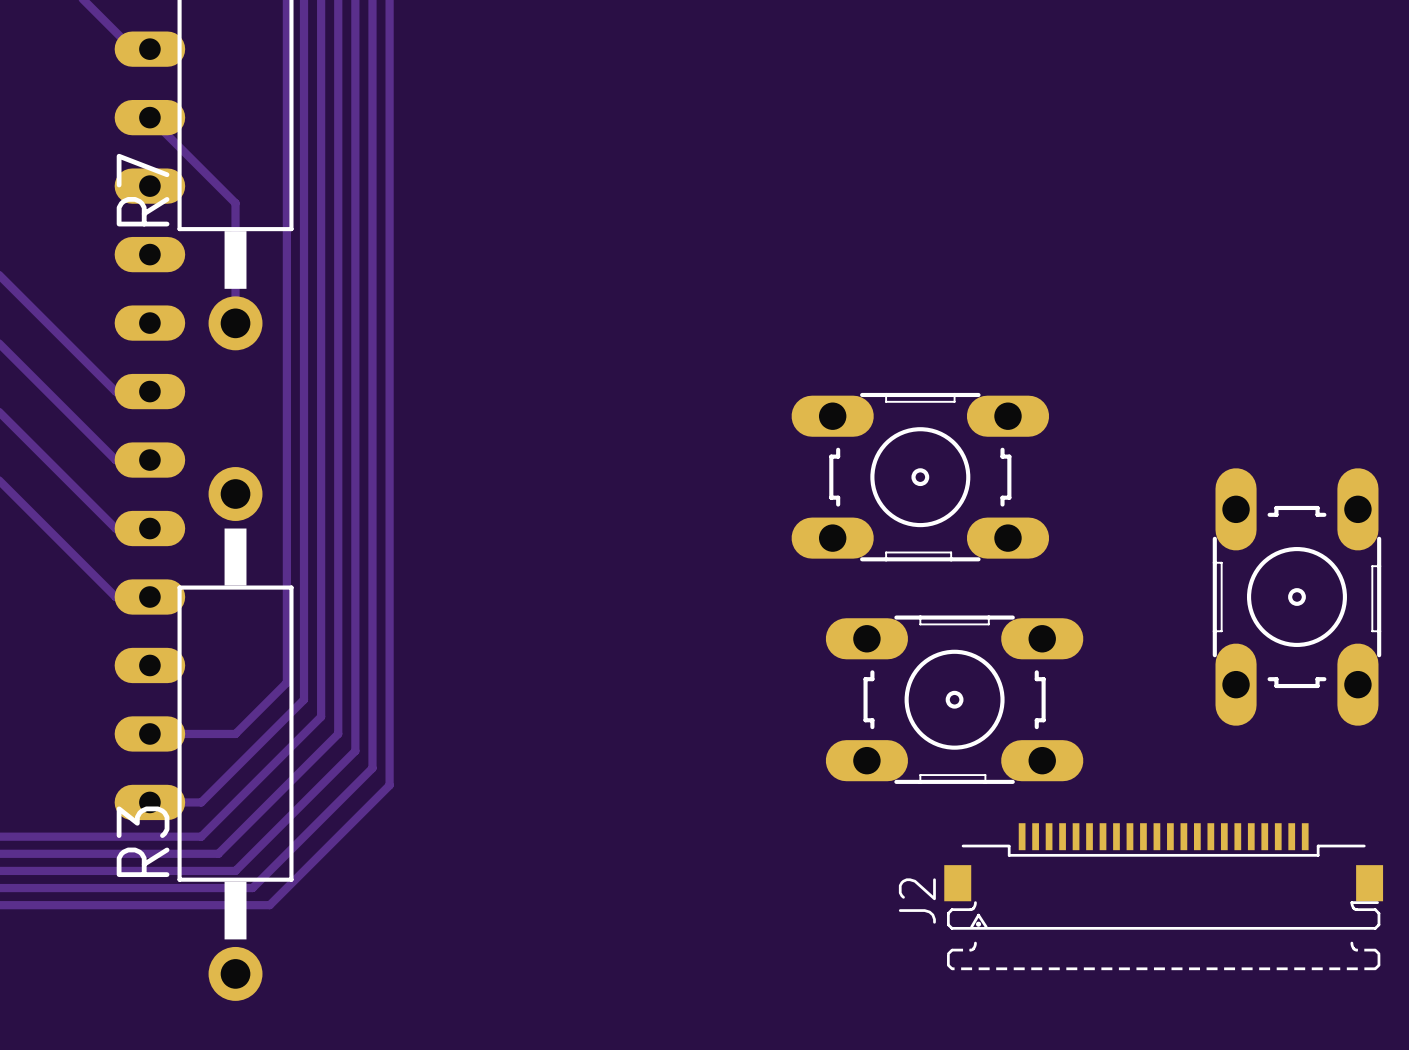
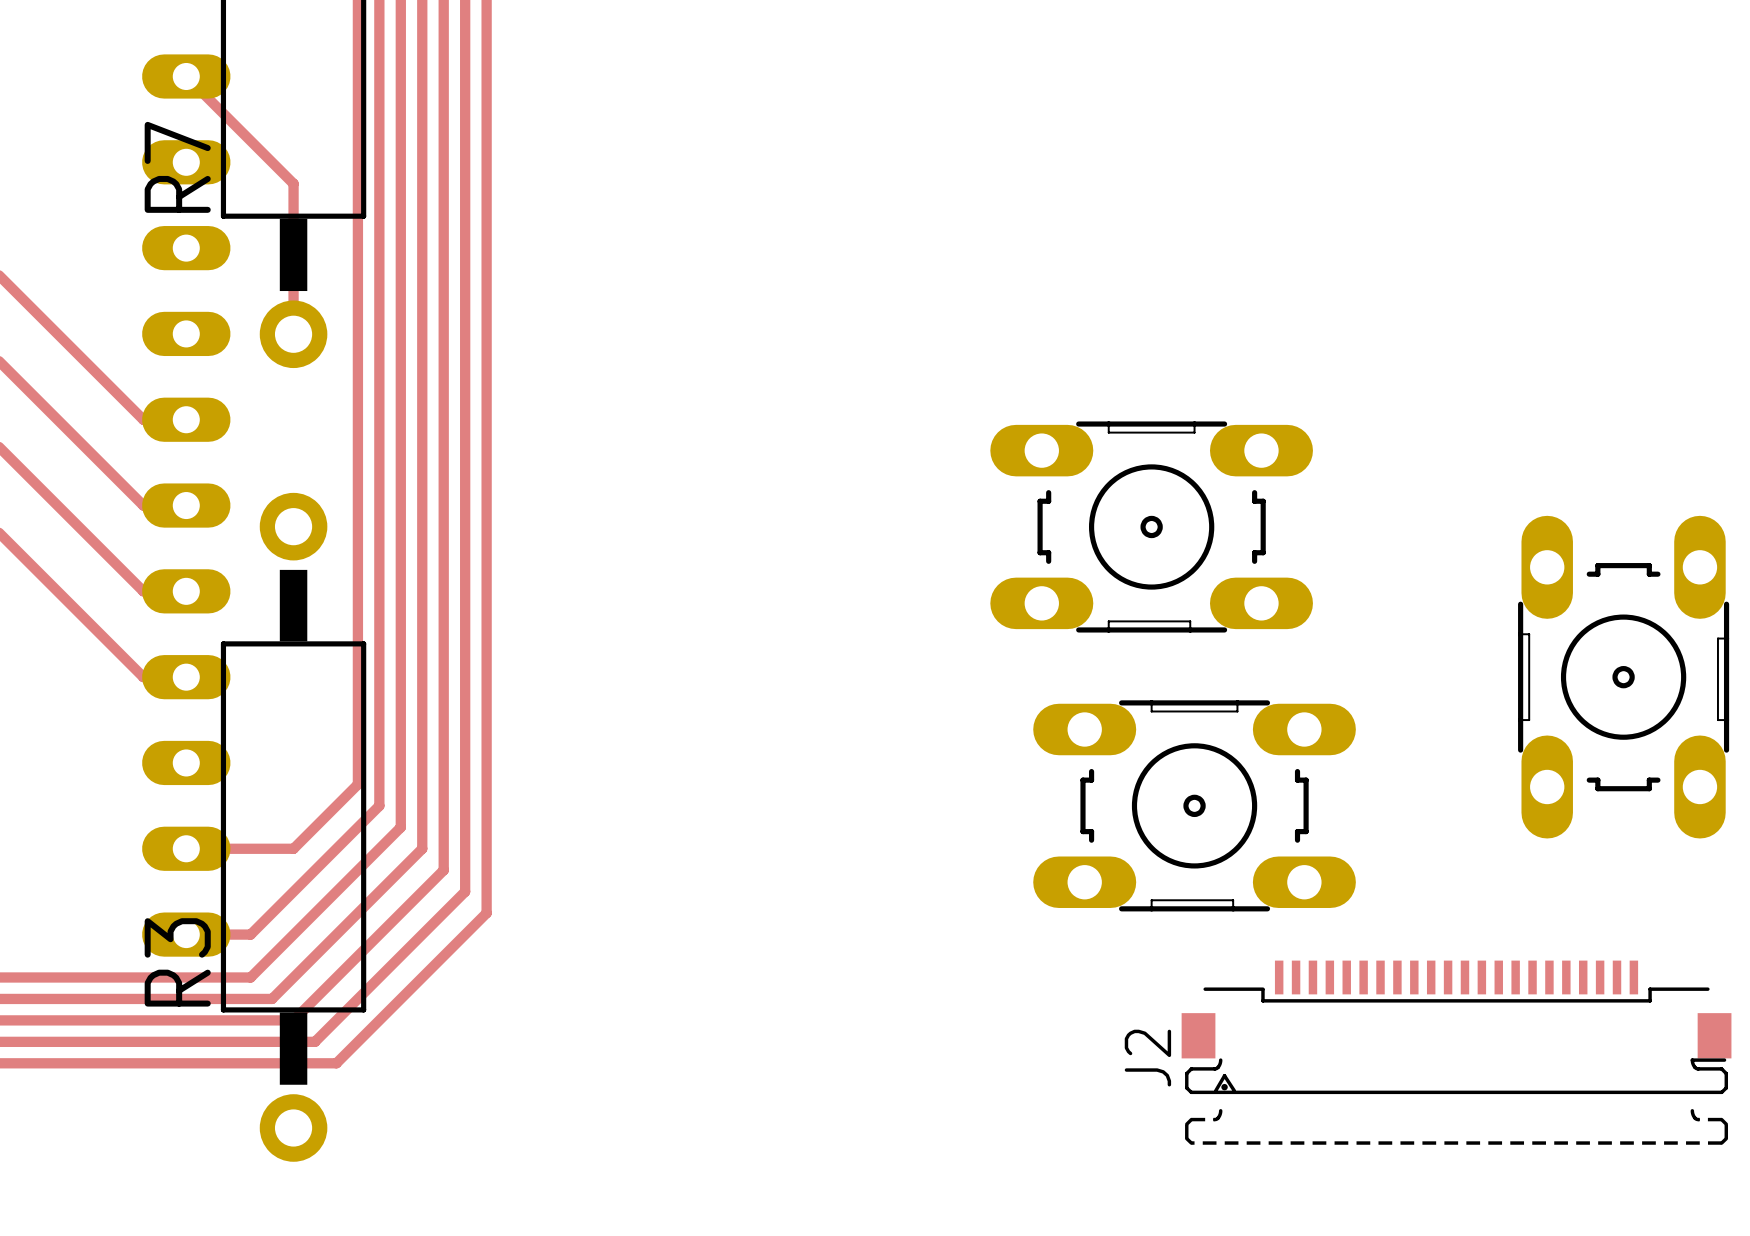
R3 position: (235, 733) -> (293, 827)

